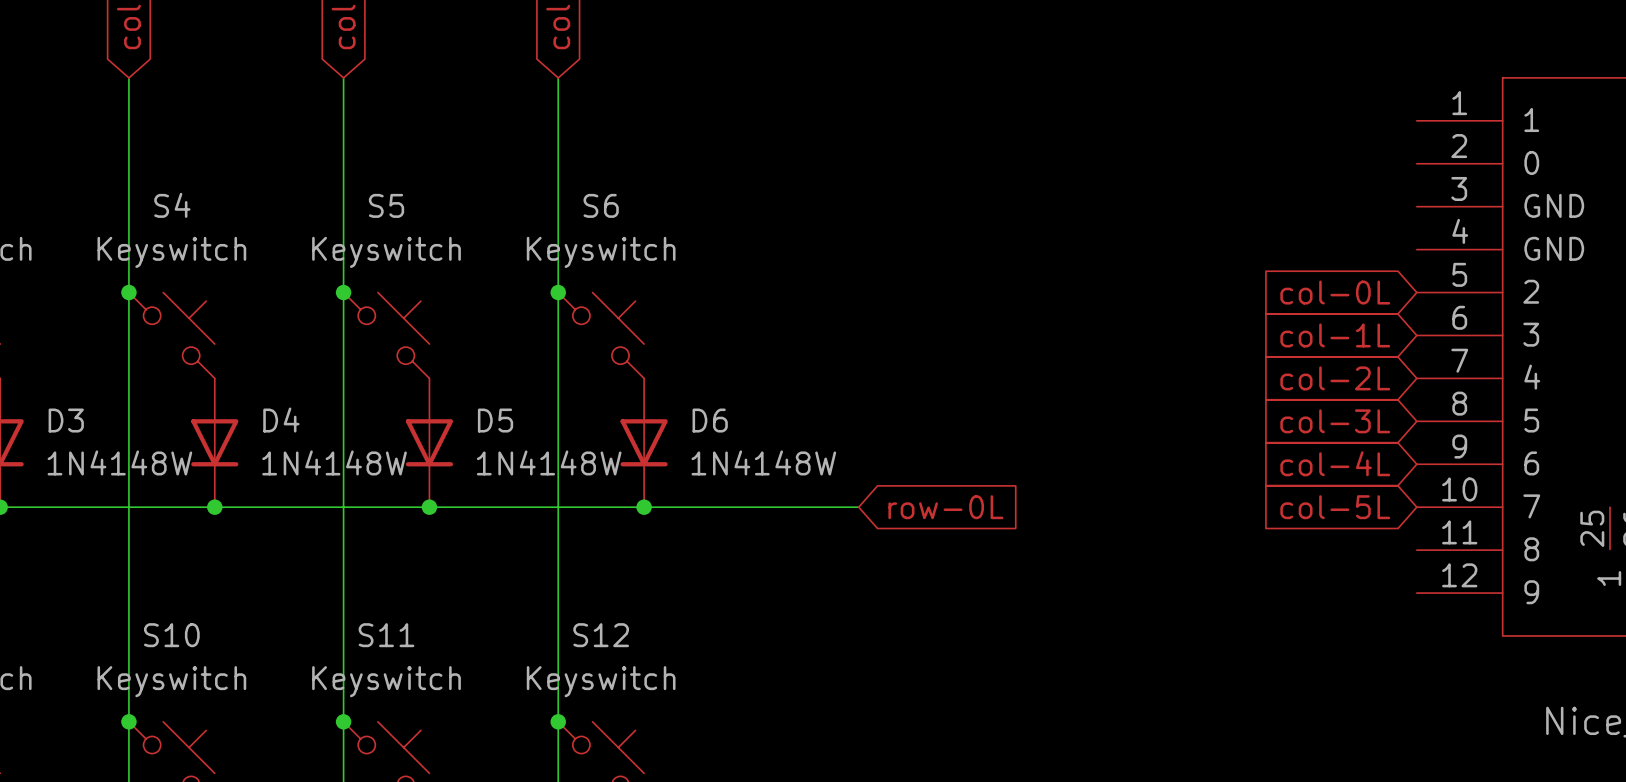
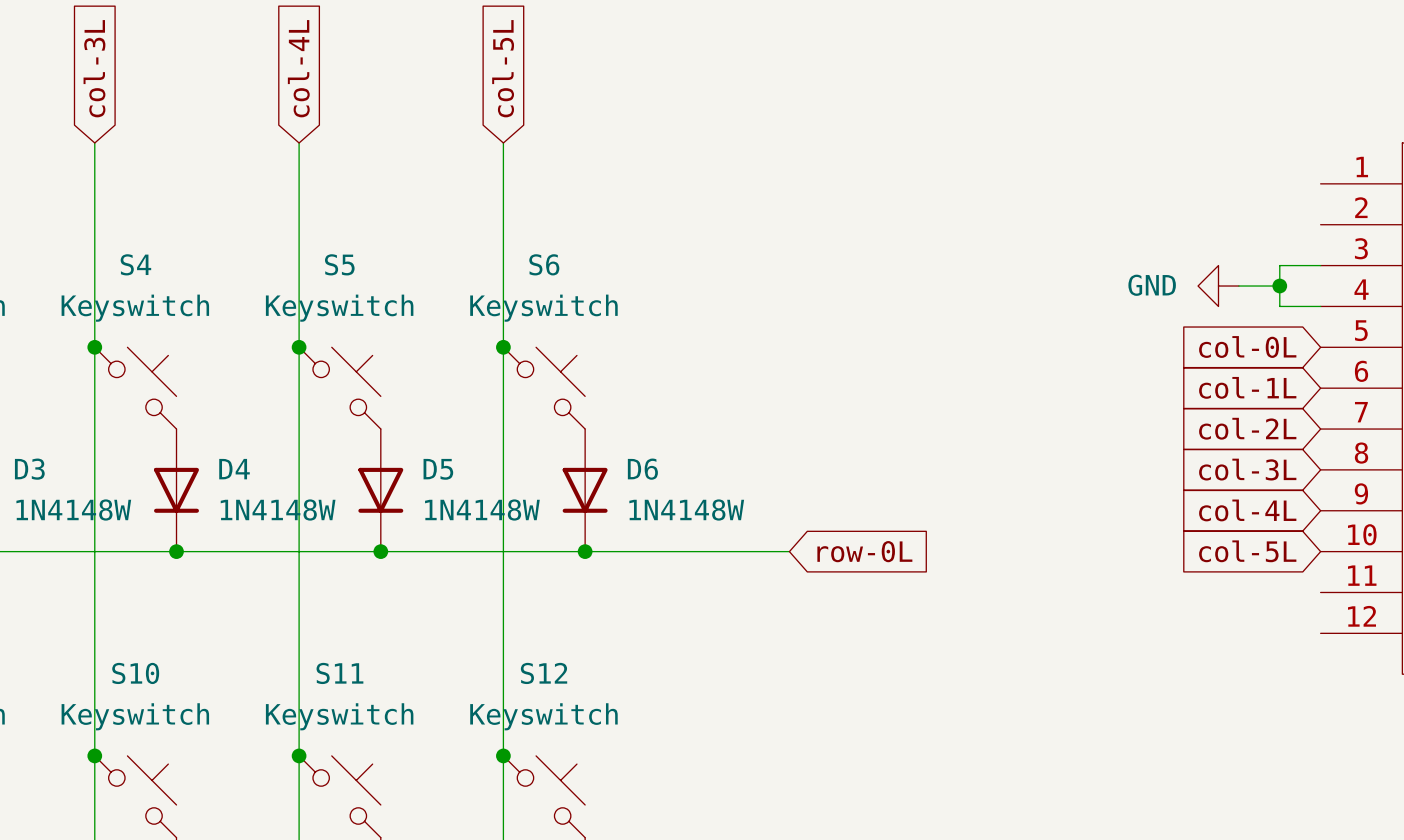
wire: none -> (1320, 265) (1279, 265) (1279, 306) (1320, 306)
power symbol: none -> GND (1218, 286)
wire: none -> (1238, 286) (1279, 286)
junction: none -> (1279, 286)

